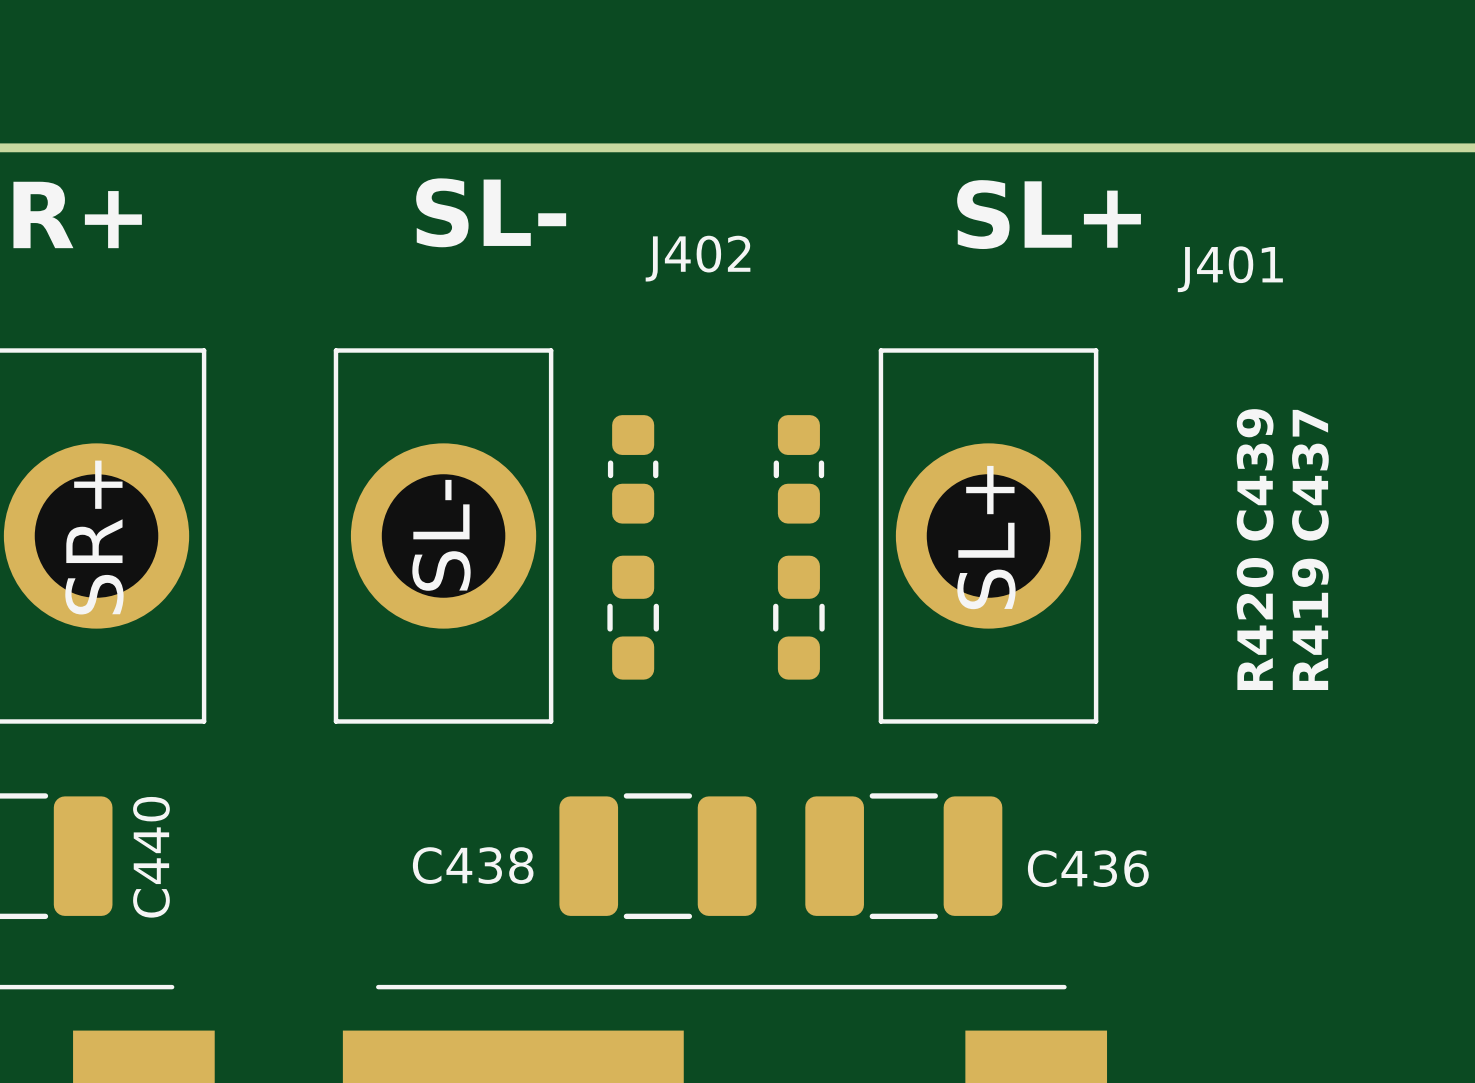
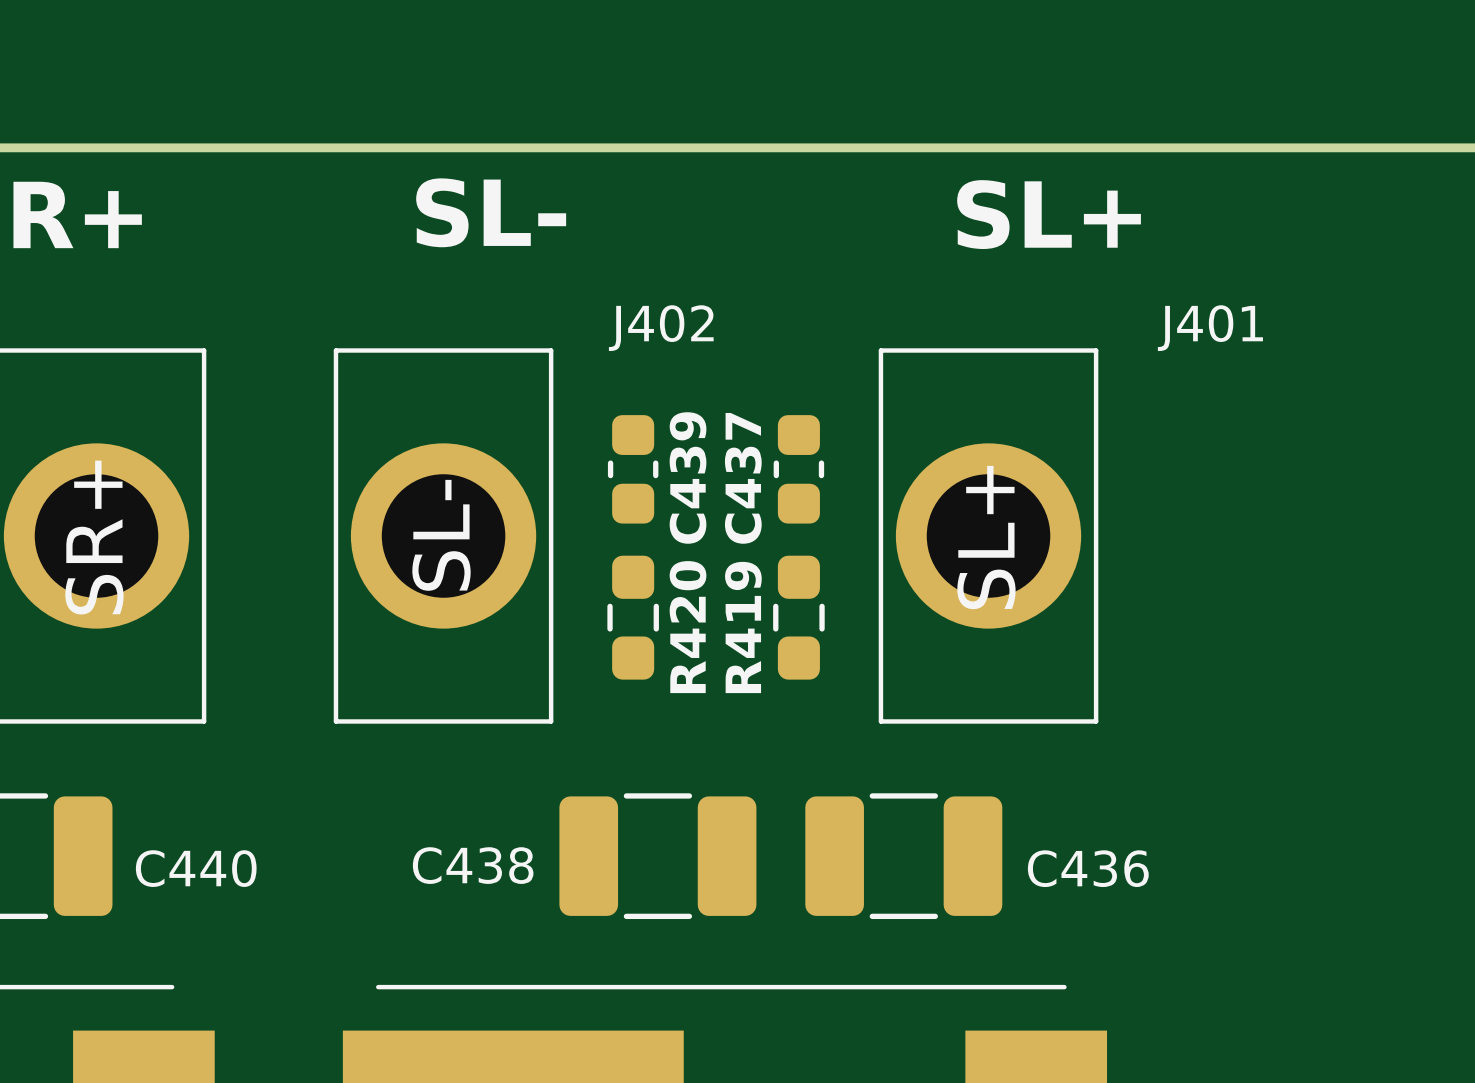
J402 name position: J402 (698, 258) -> J402 (661, 328)
J401 name position: J401 (1230, 269) -> J401 (1210, 328)
C439 name position: C439 (1255, 474) -> C439 (688, 477)
C437 name position: C437 (1310, 475) -> C437 (743, 478)
R420 name position: R420 (1255, 623) -> R420 (688, 627)
R419 name position: R419 (1310, 624) -> R419 (743, 627)
C440 name rotation: 0° (151, 857) -> 90° clockwise (196, 868)

